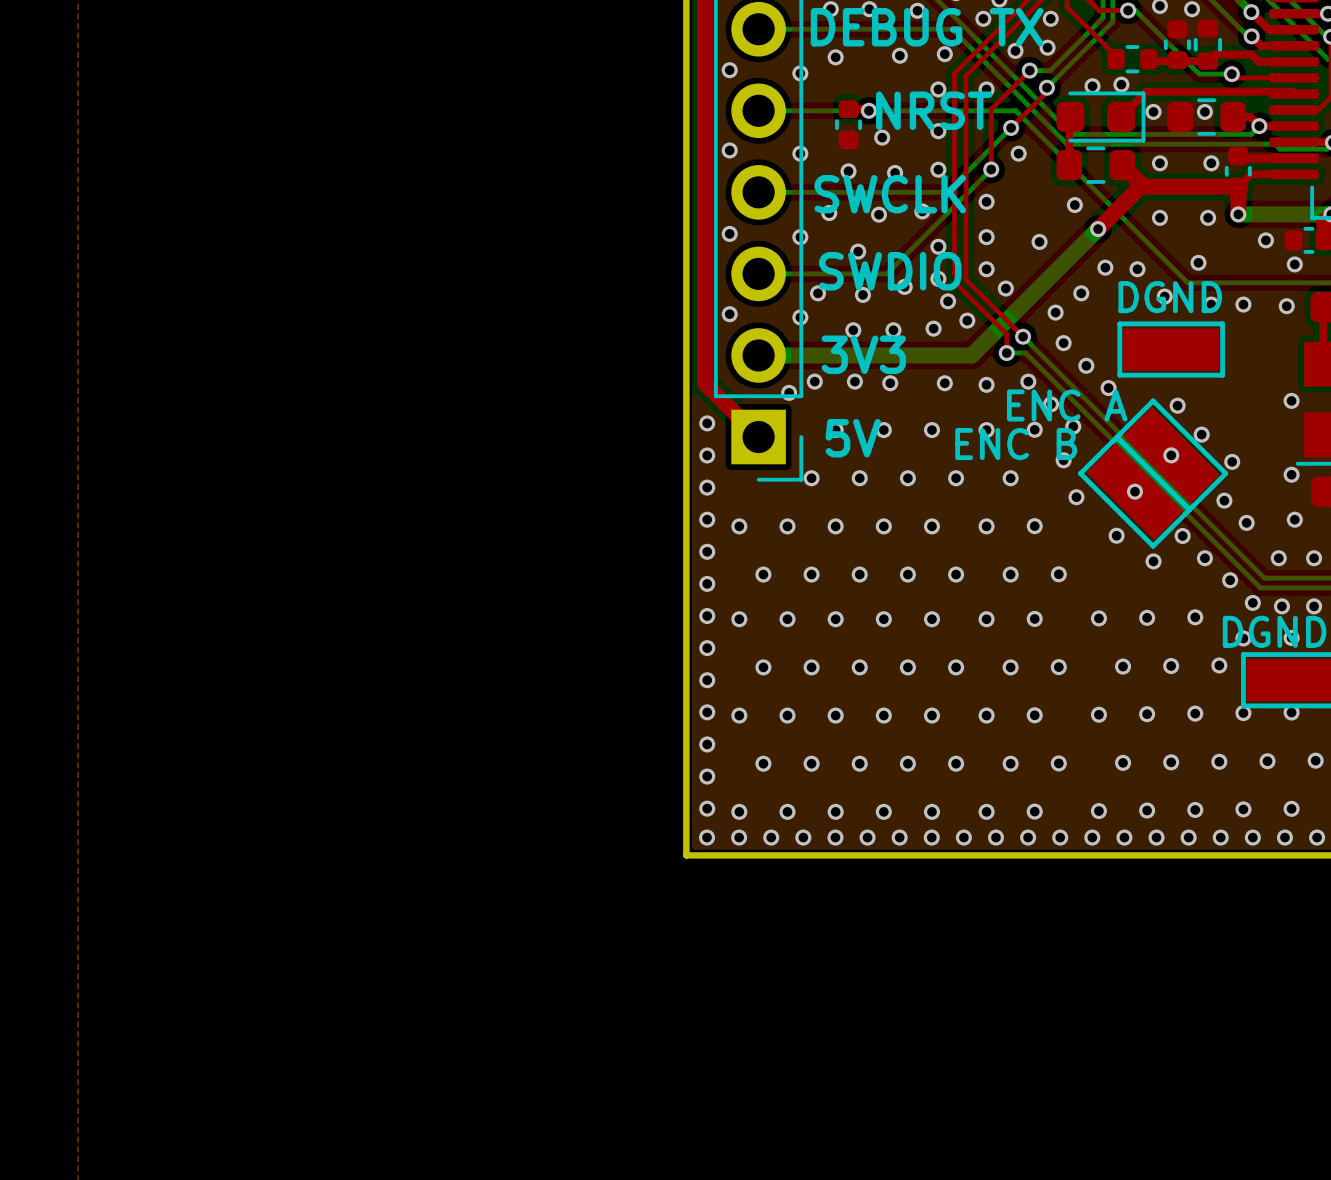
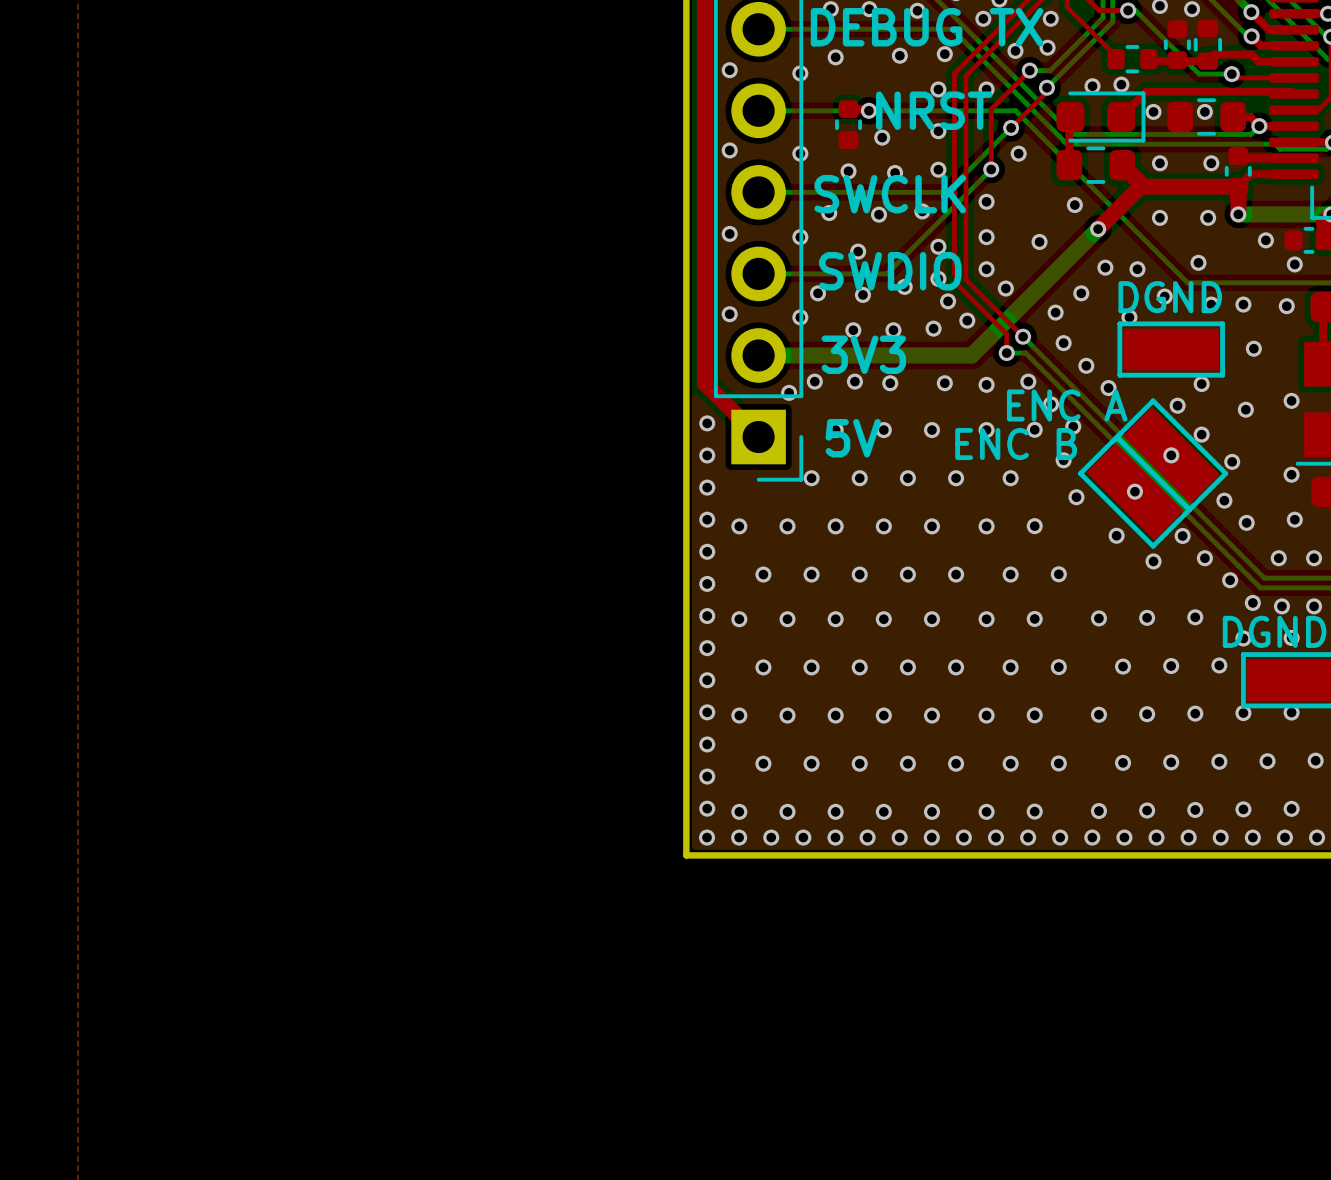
via: none -> (1129, 317)
via: none -> (1253, 348)
via: none -> (1201, 384)
via: none -> (1245, 409)

